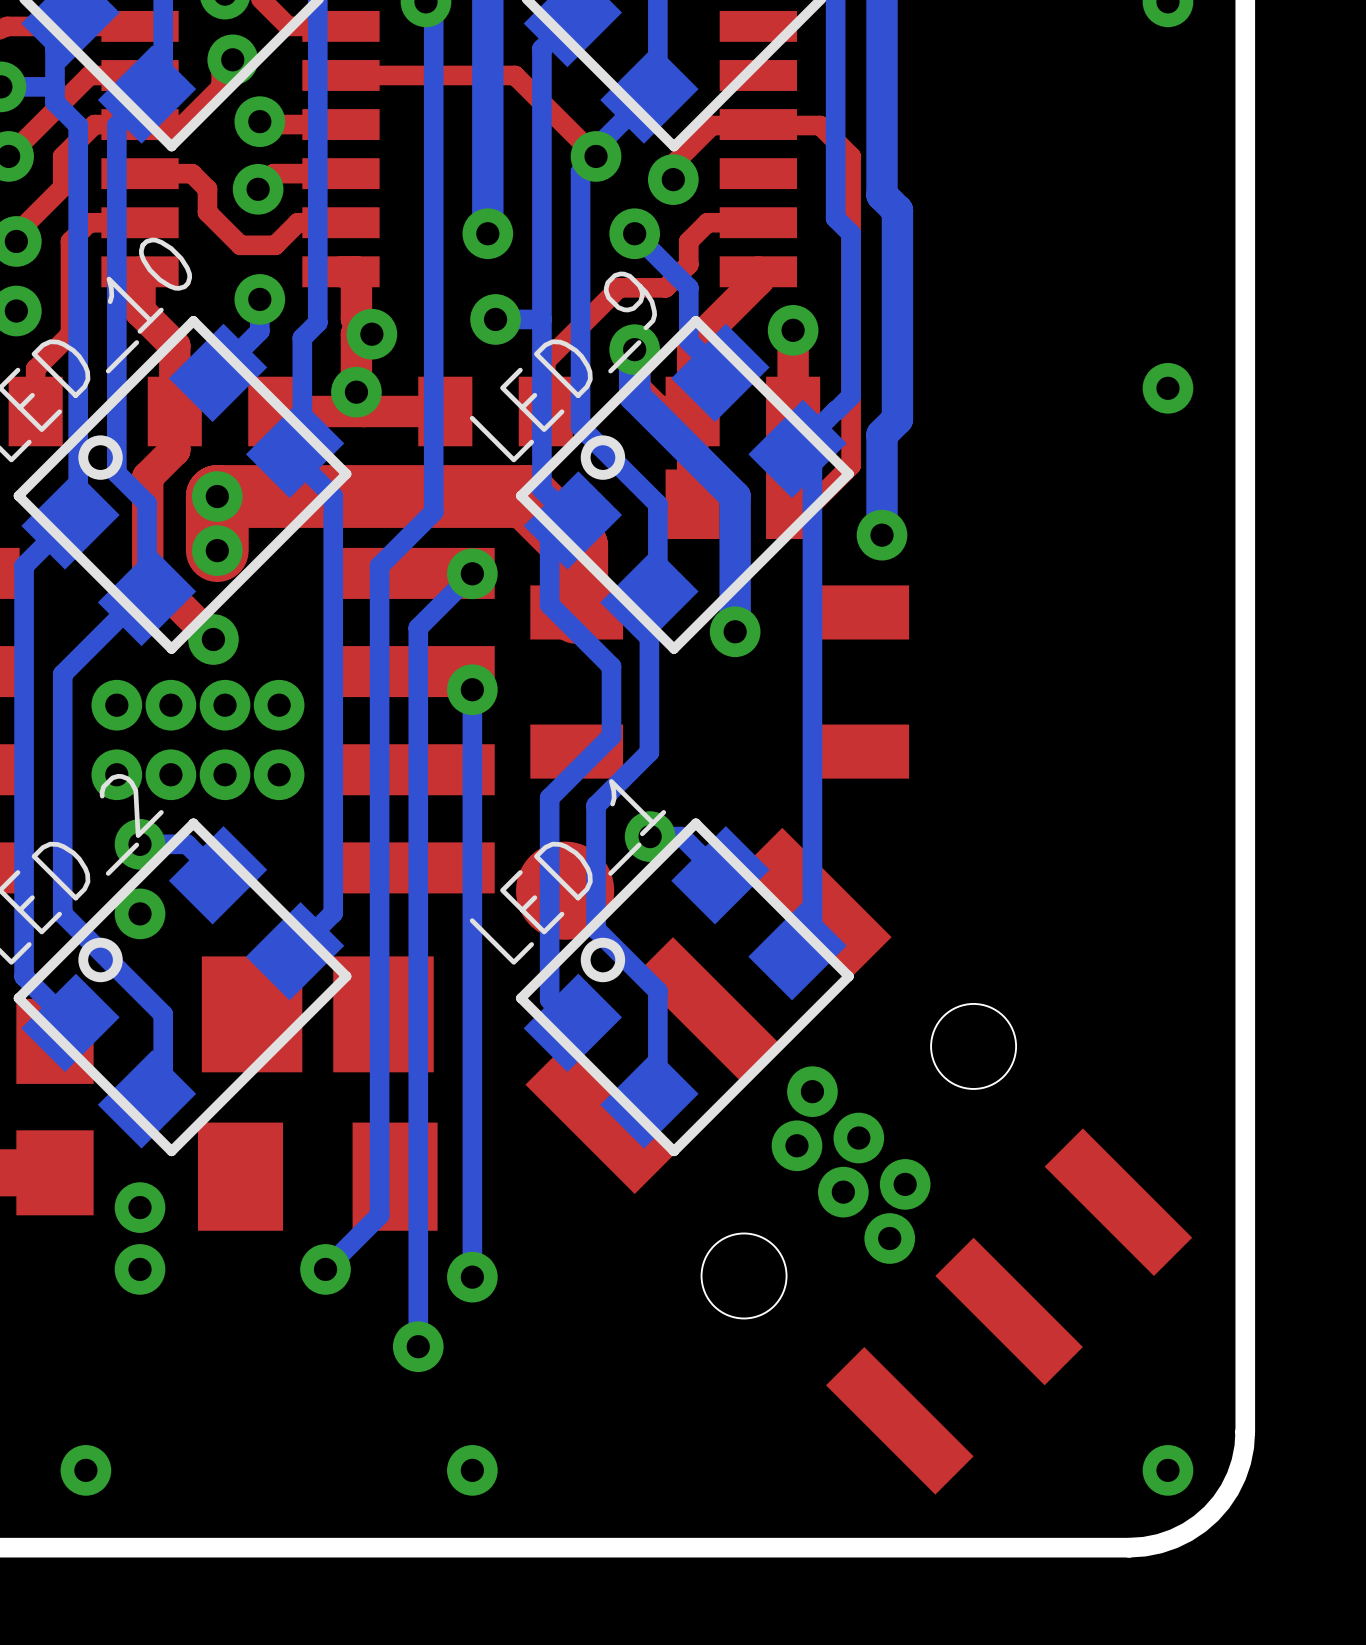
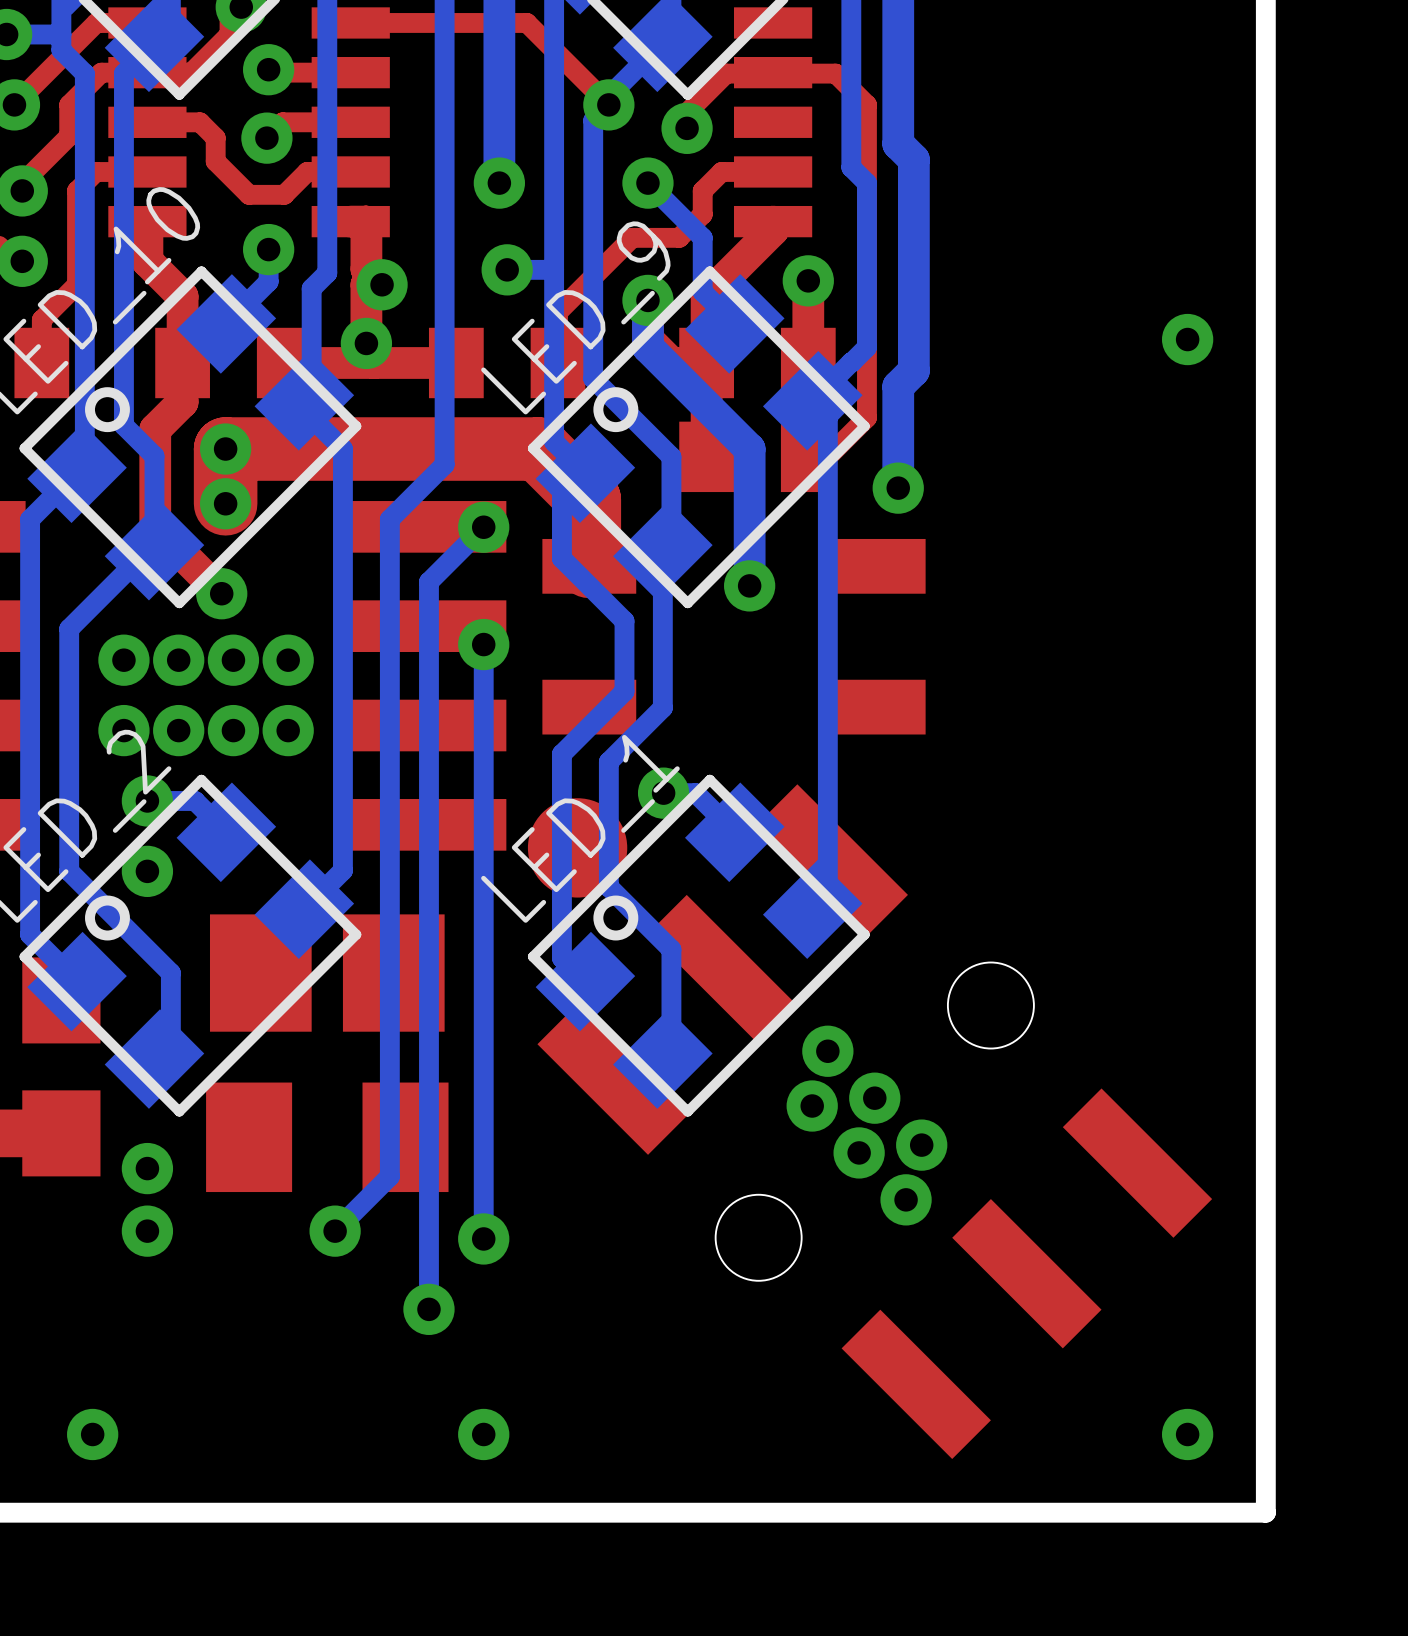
board edge: (1245, 1431) (1244, 1446) (1236, 1476) (1229, 1489) (1211, 1513) (1187, 1532) (1173, 1538) (1144, 1546) (1129, 1547) -> (1265, 1395) (1265, 1512) (1148, 1512)

